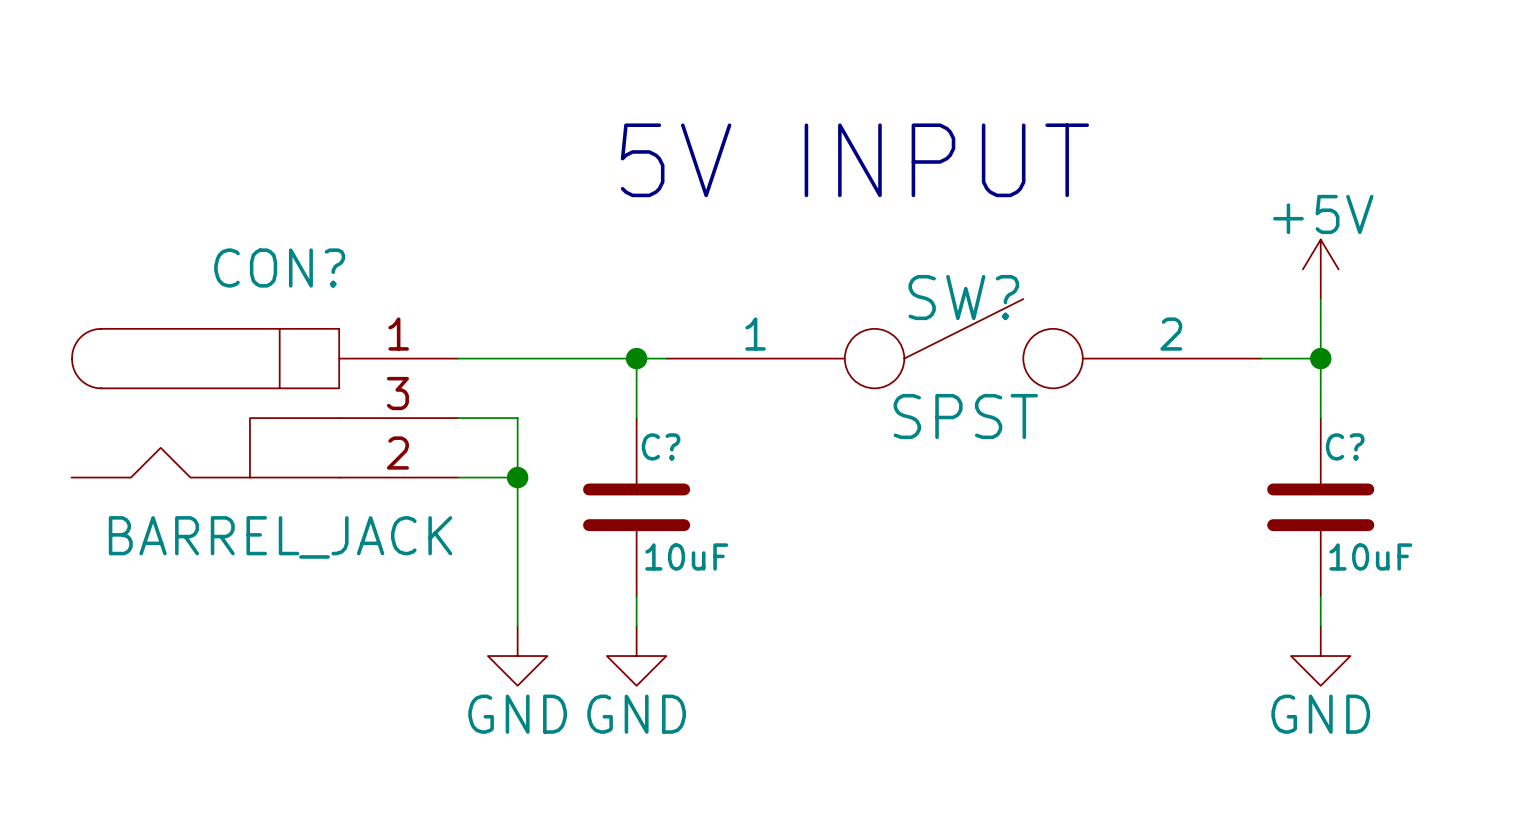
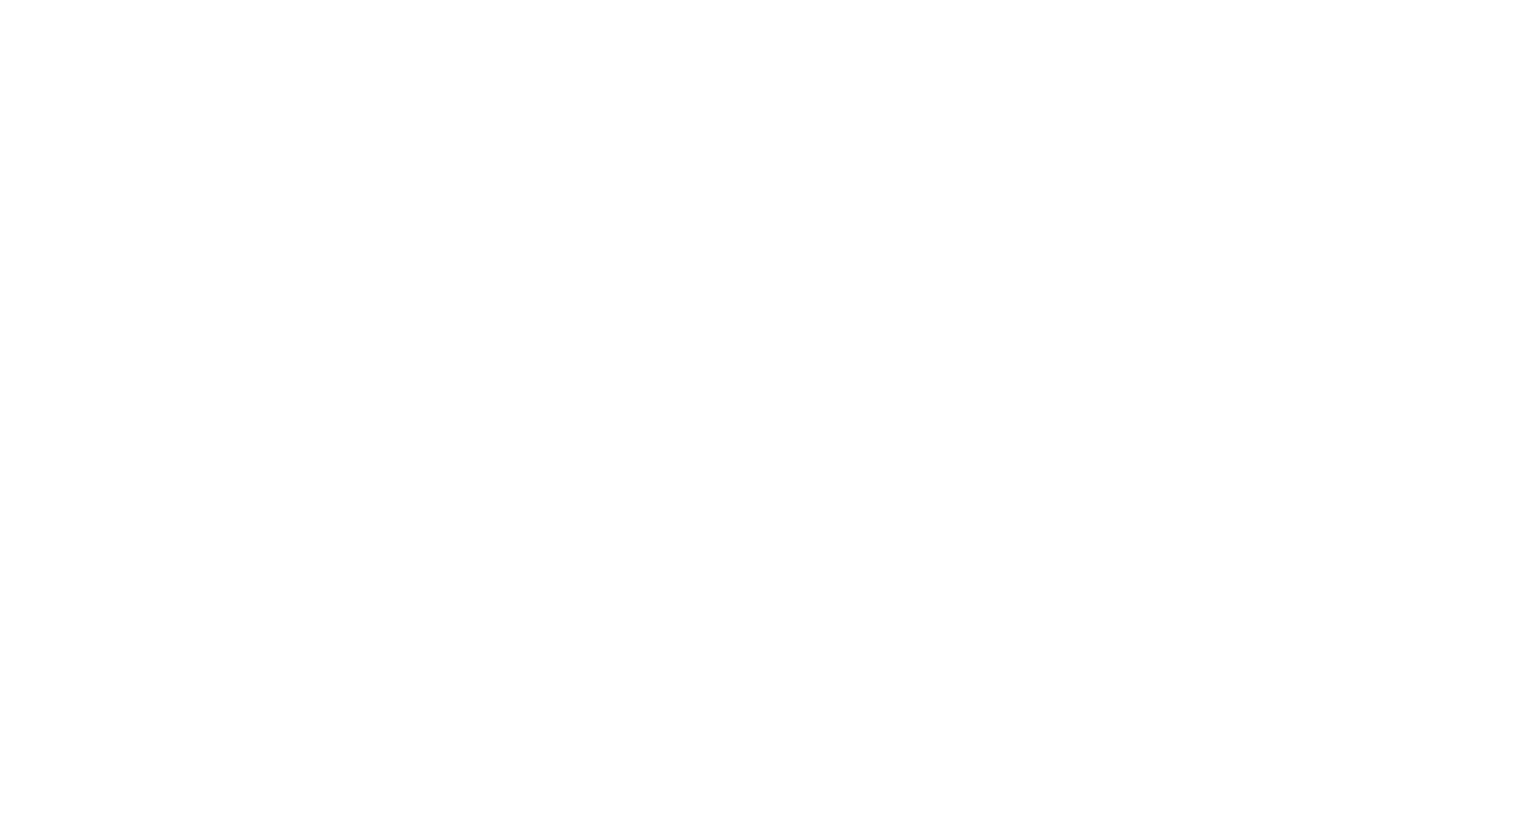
text: 5V INPUT (854, 160) -> none
power symbol: +5V (1320, 269) -> none
wire: (1320, 299) (1320, 418) -> none
SW?: SPST (963, 343) -> none
wire: (458, 358) (666, 358) -> none
wire: (636, 358) (636, 418) -> none
junction: (636, 358) -> none
wire: (1261, 358) (1320, 358) -> none
junction: (1320, 358) -> none
CON?: BARREL_JACK (264, 403) -> none
wire: (458, 418) (517, 418) (517, 626) -> none
wire: (458, 477) (517, 477) -> none
junction: (517, 477) -> none
C?: 10uF (636, 507) -> none
C?: 10uF (1320, 507) -> none
wire: (636, 596) (636, 626) -> none
wire: (1320, 596) (1320, 626) -> none
power symbol: GND (517, 656) -> none
power symbol: GND (636, 656) -> none
power symbol: GND (1320, 656) -> none

